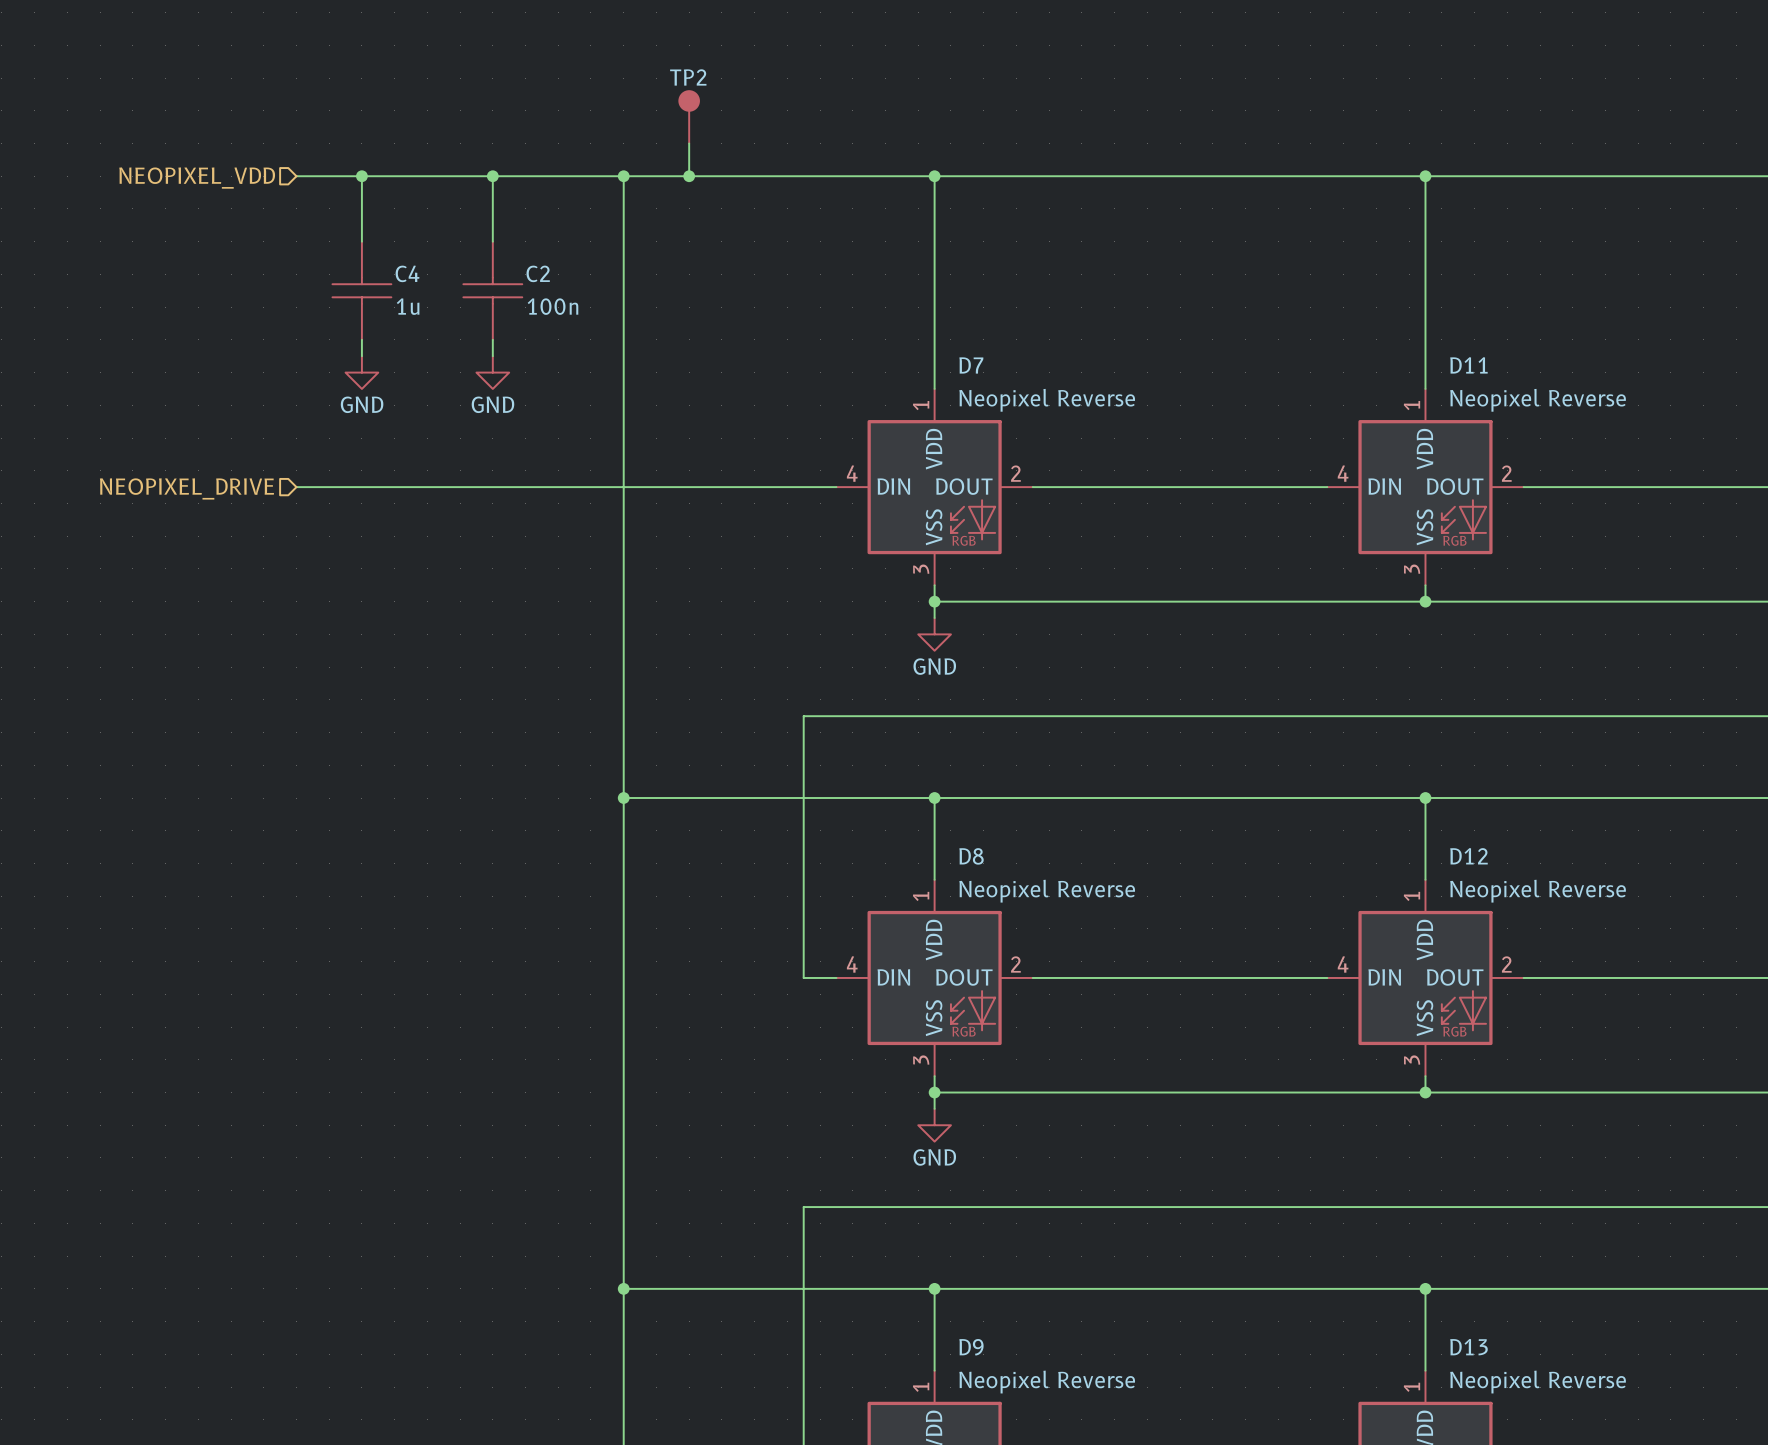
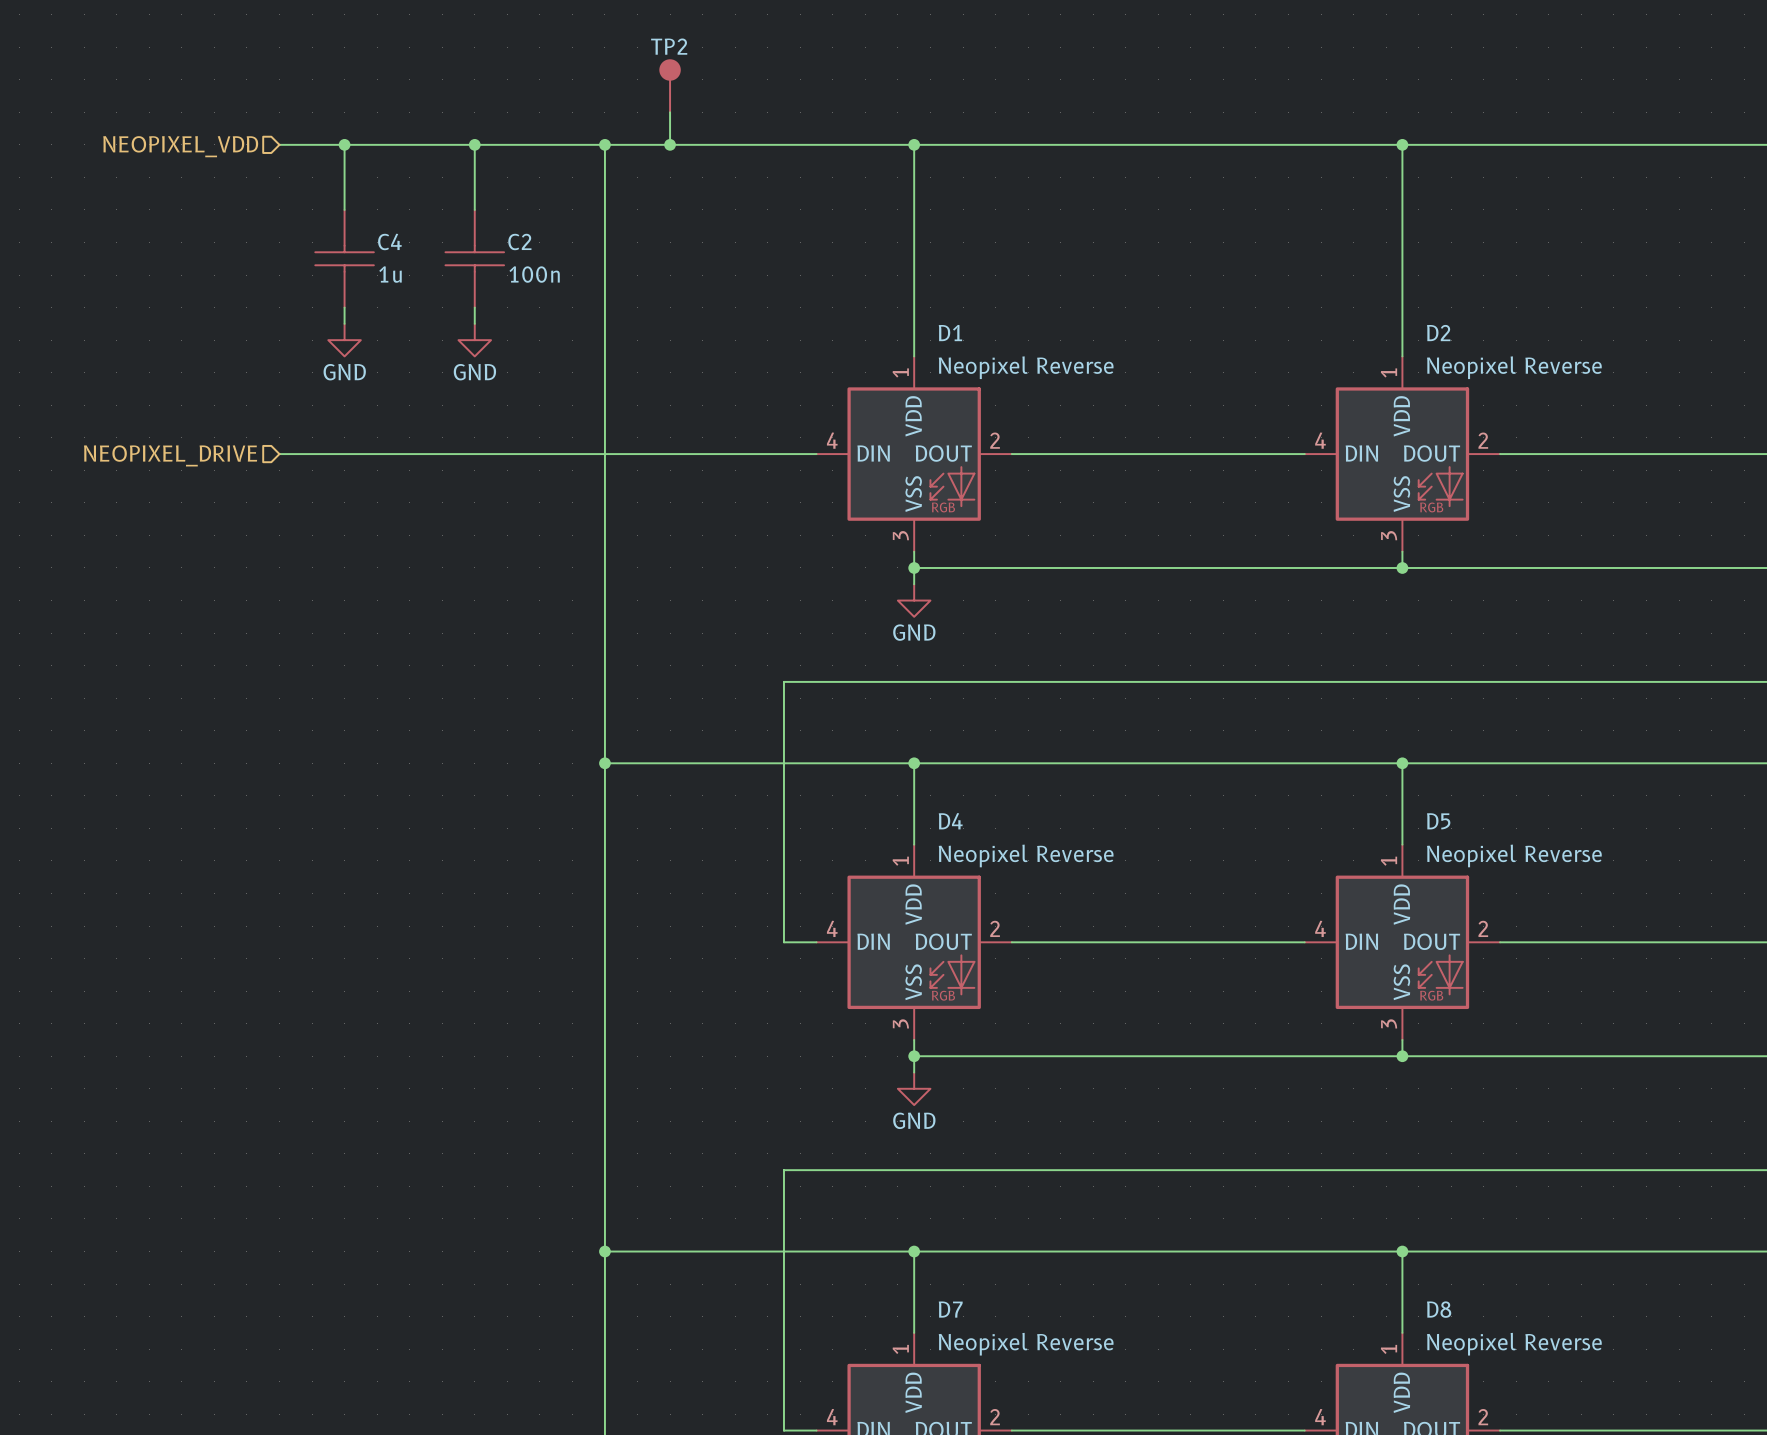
D7 name: D7 (971, 365) -> D1 (950, 333)
D11 name: D11 (1468, 365) -> D2 (1438, 333)
D8 name: D8 (971, 856) -> D4 (950, 821)
D12 name: D12 (1468, 856) -> D5 (1438, 821)
D9 name: D9 (971, 1347) -> D7 (950, 1309)
D13 name: D13 (1468, 1347) -> D8 (1439, 1309)

